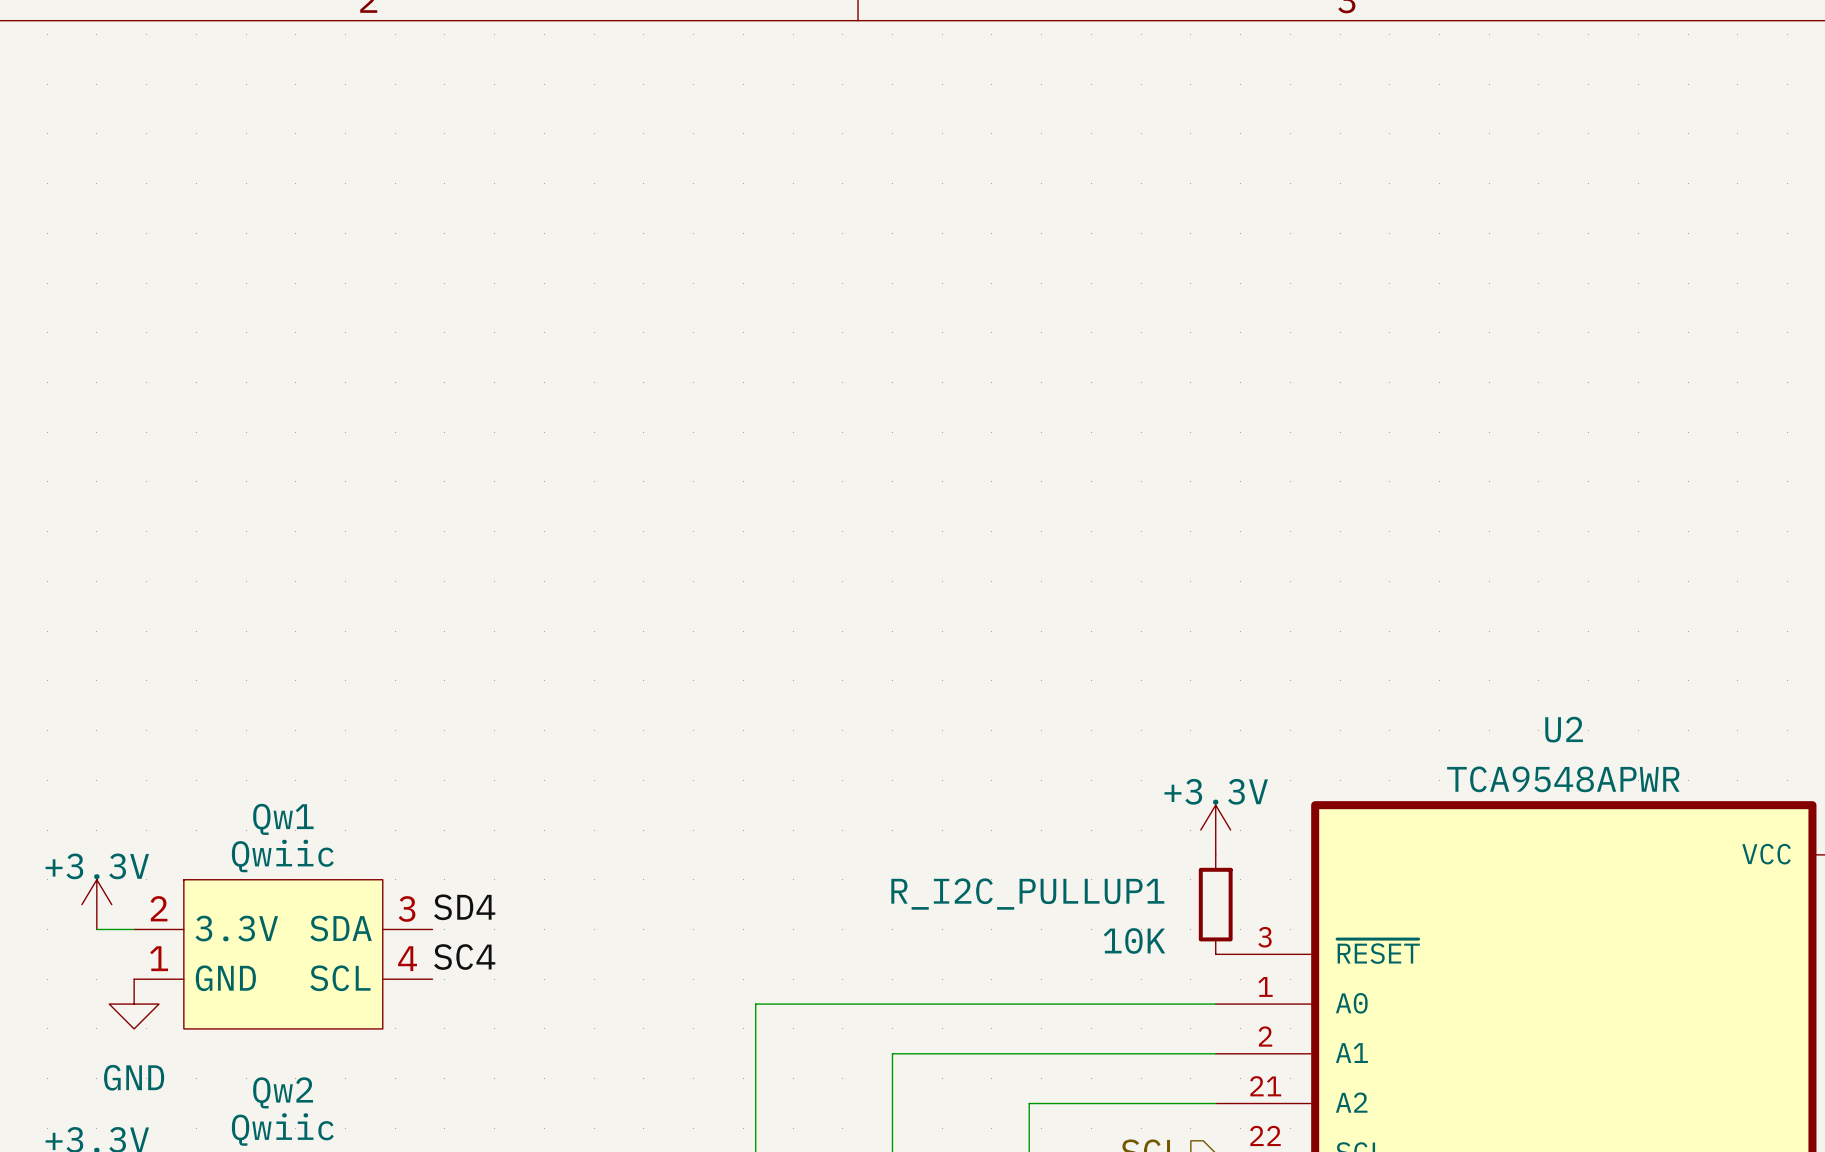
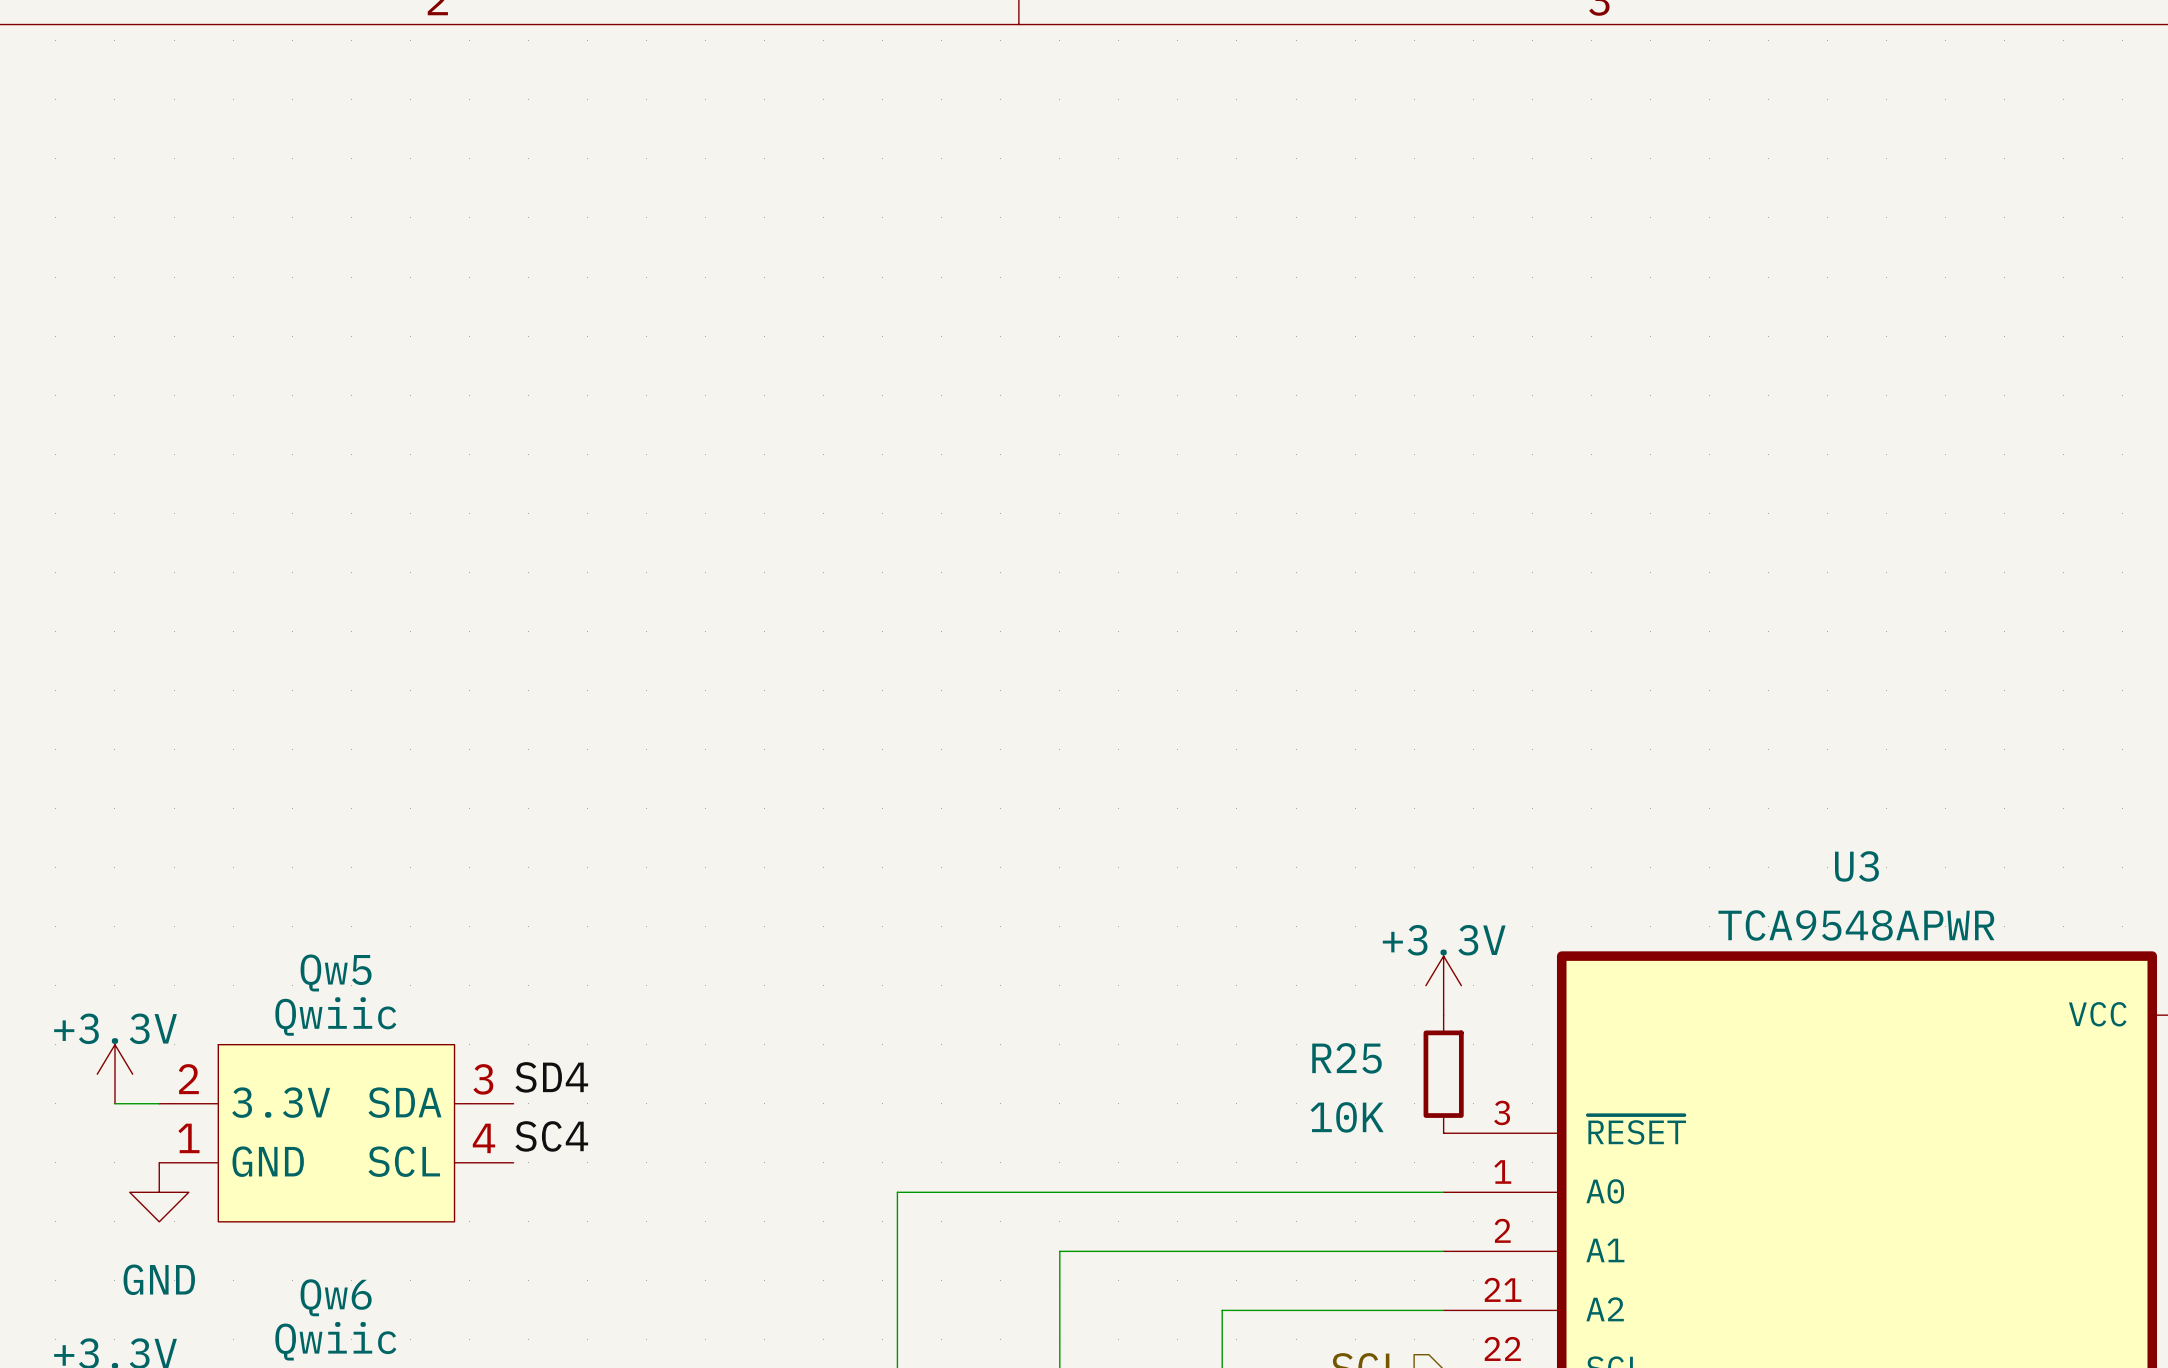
U2 name: U2 (1564, 729) -> U3 (1856, 866)
Qw1 name: Qw1 (283, 819) -> Qw5 (336, 972)
R_I2C_PULLUP1 name: R_I2C_PULLUP1 (1027, 894) -> R25 (1347, 1058)
Qw2 name: Qw2 (283, 1092) -> Qw6 (336, 1297)

